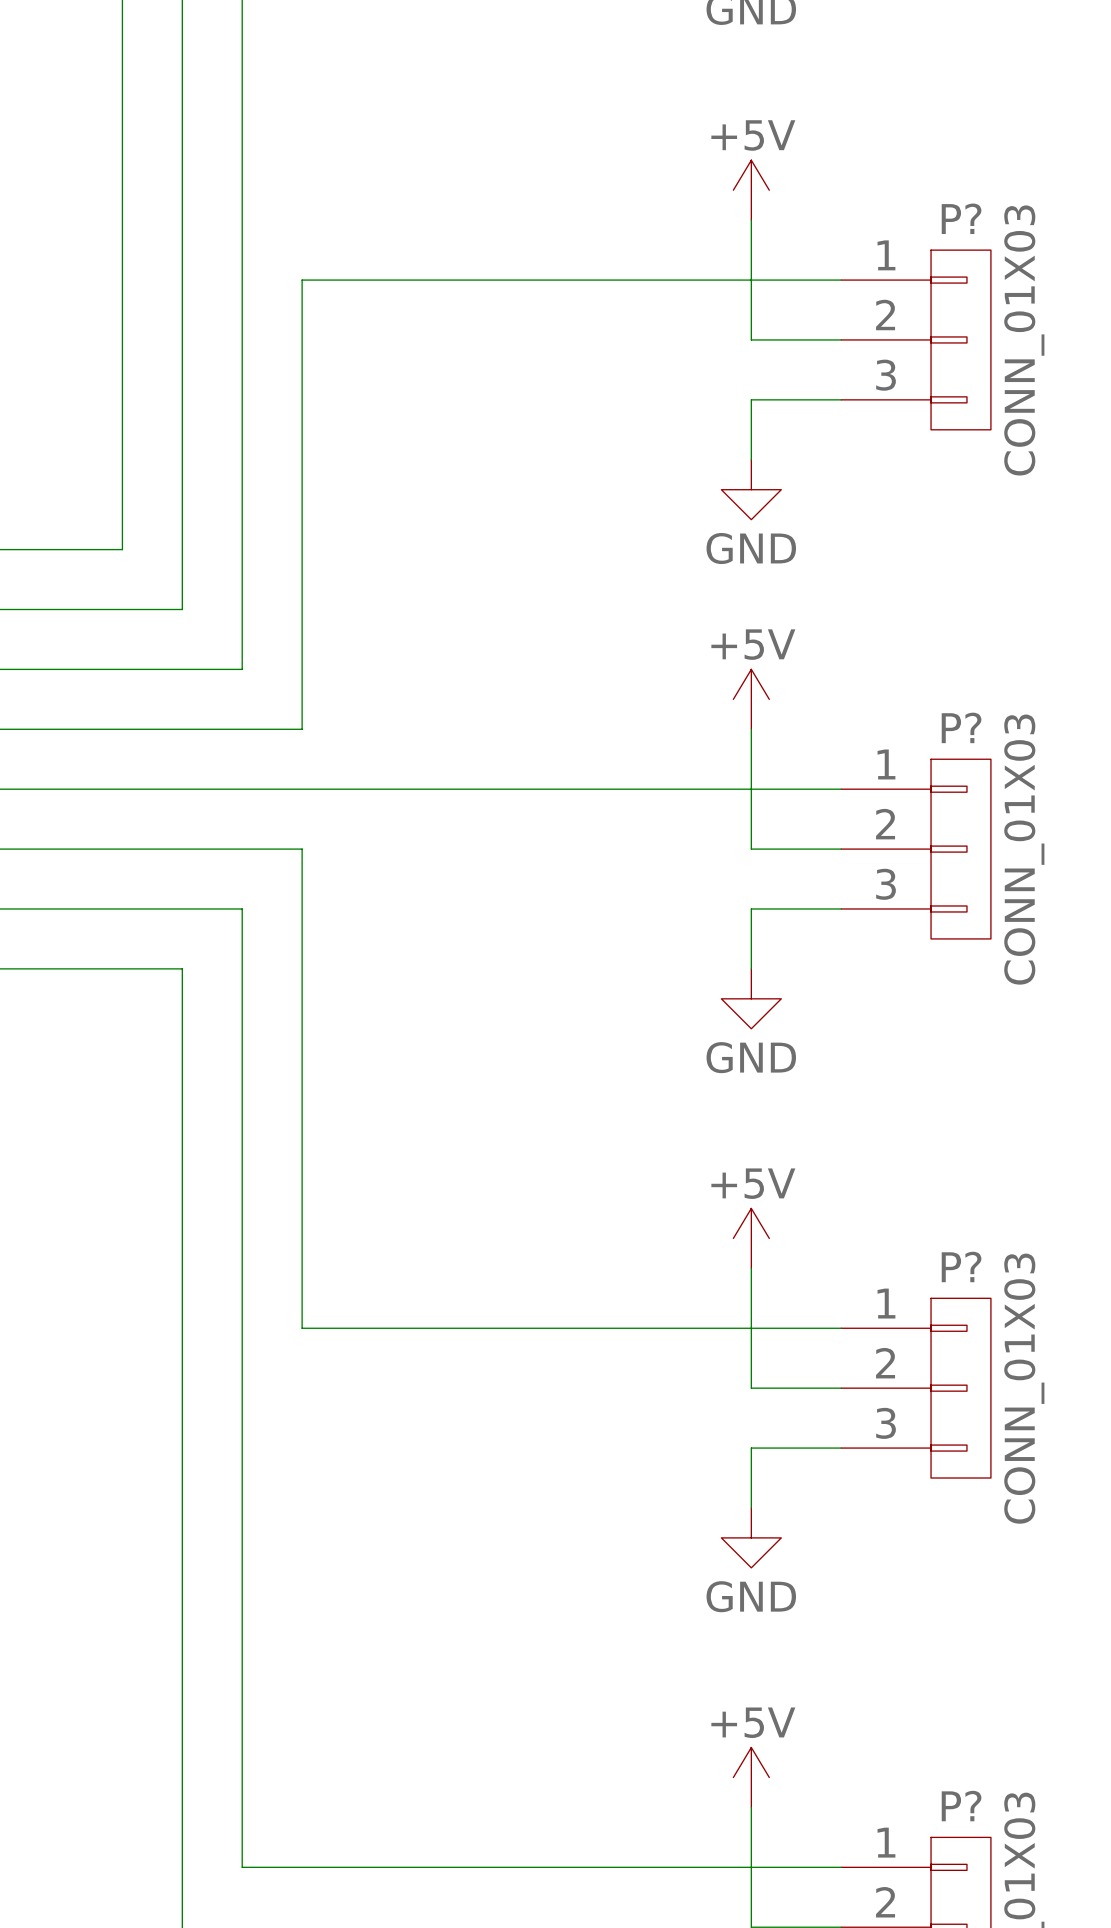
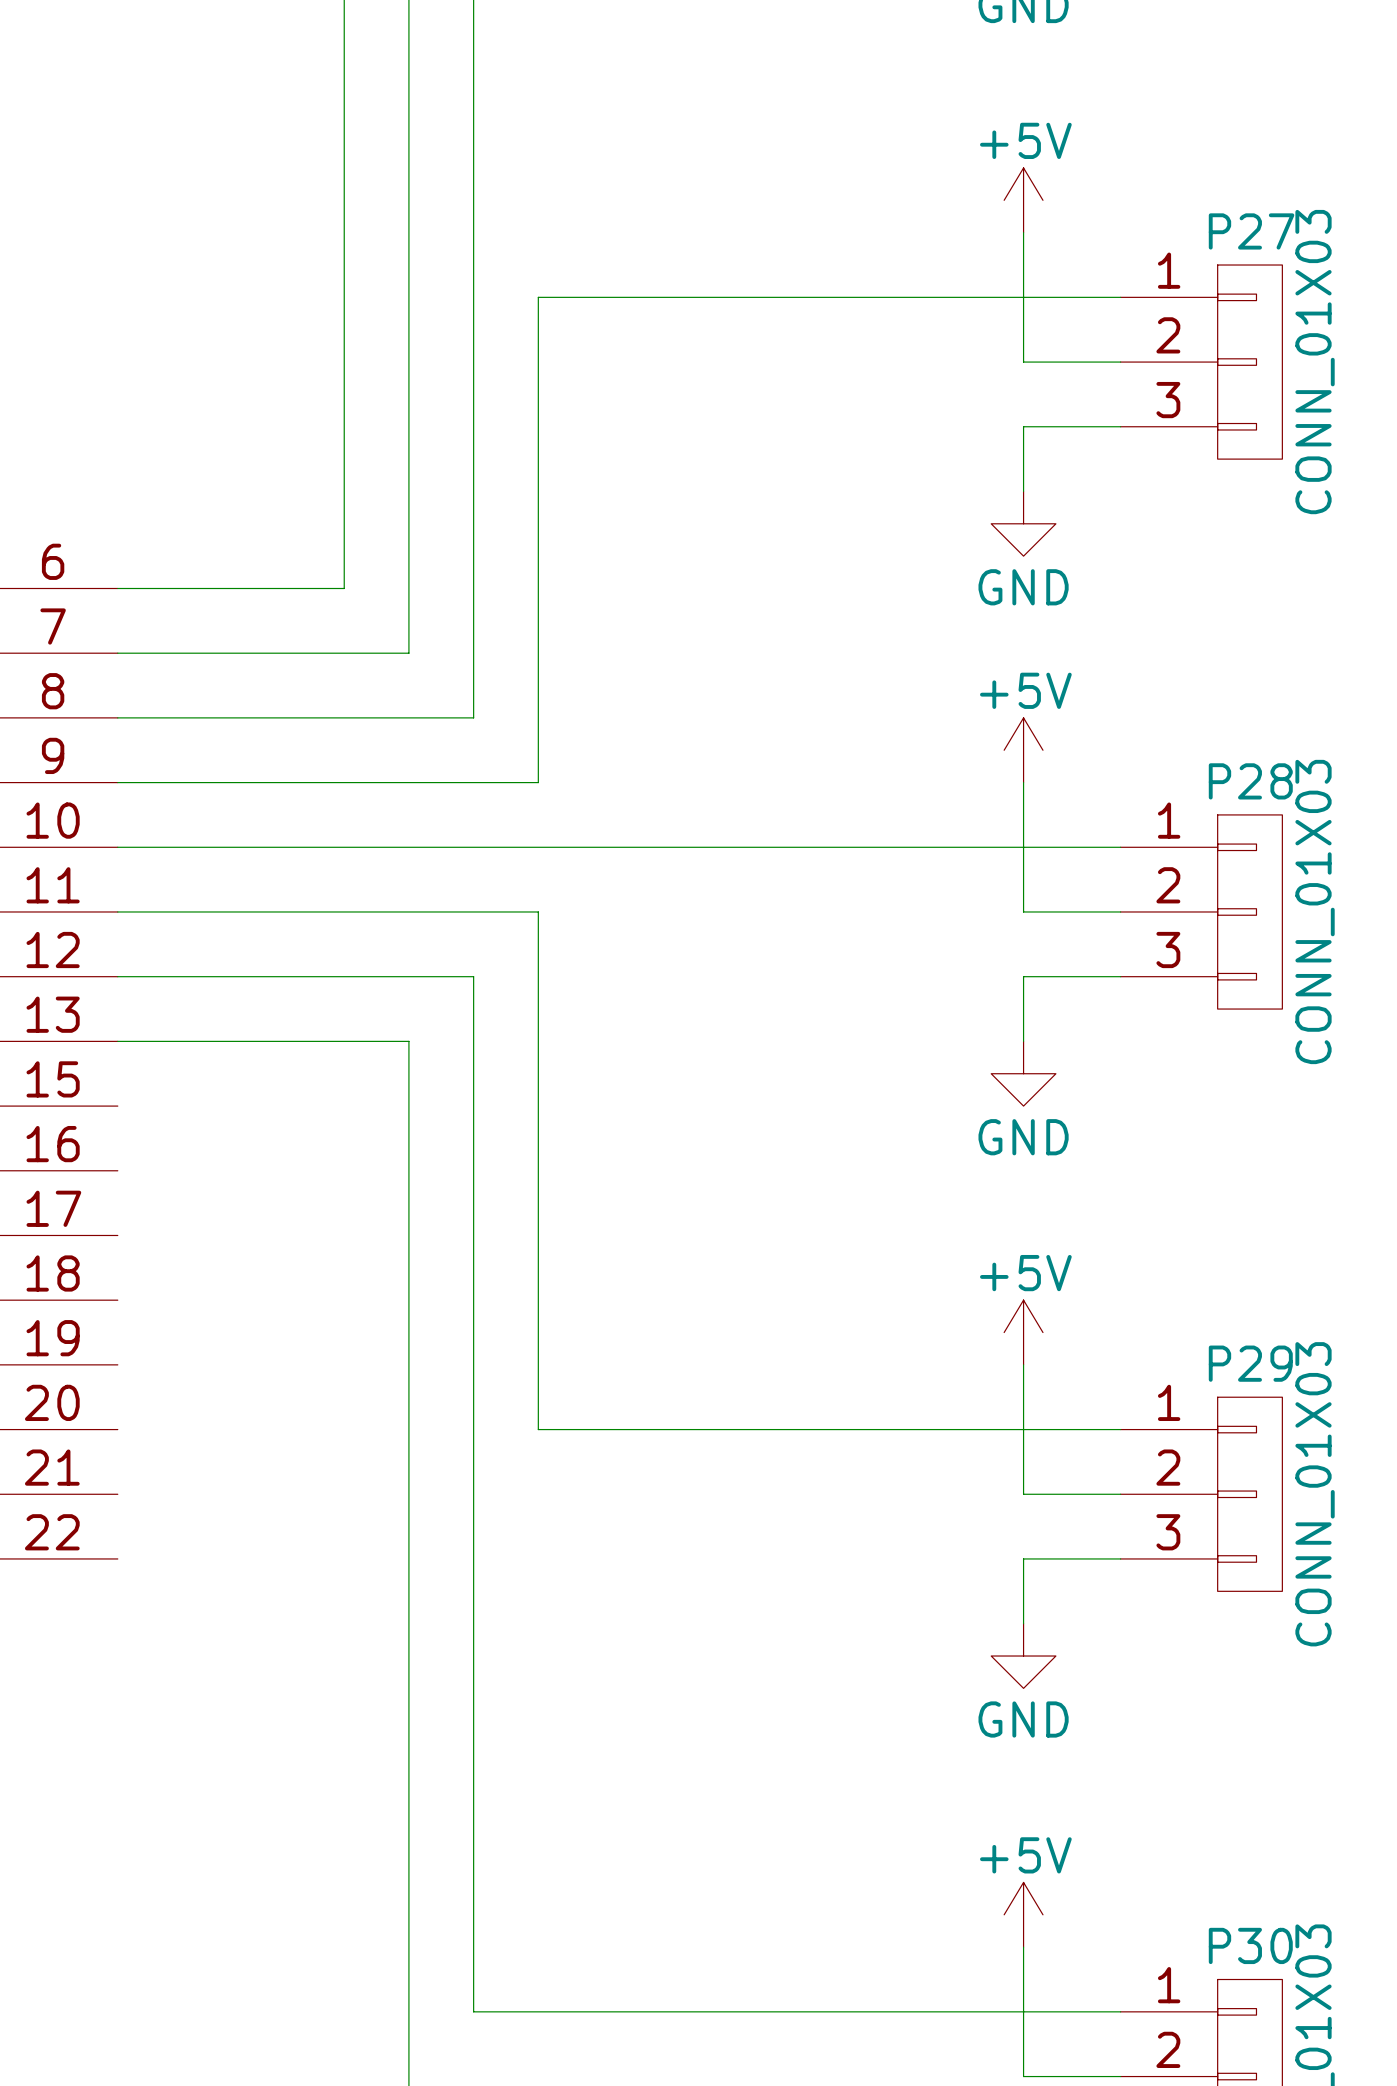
P? name: P? (961, 218) -> P27 (1251, 231)
P? name: P? (961, 727) -> P28 (1250, 781)
P? name: P? (961, 1266) -> P29 (1250, 1363)
P? name: P? (961, 1806) -> P30 (1250, 1945)

